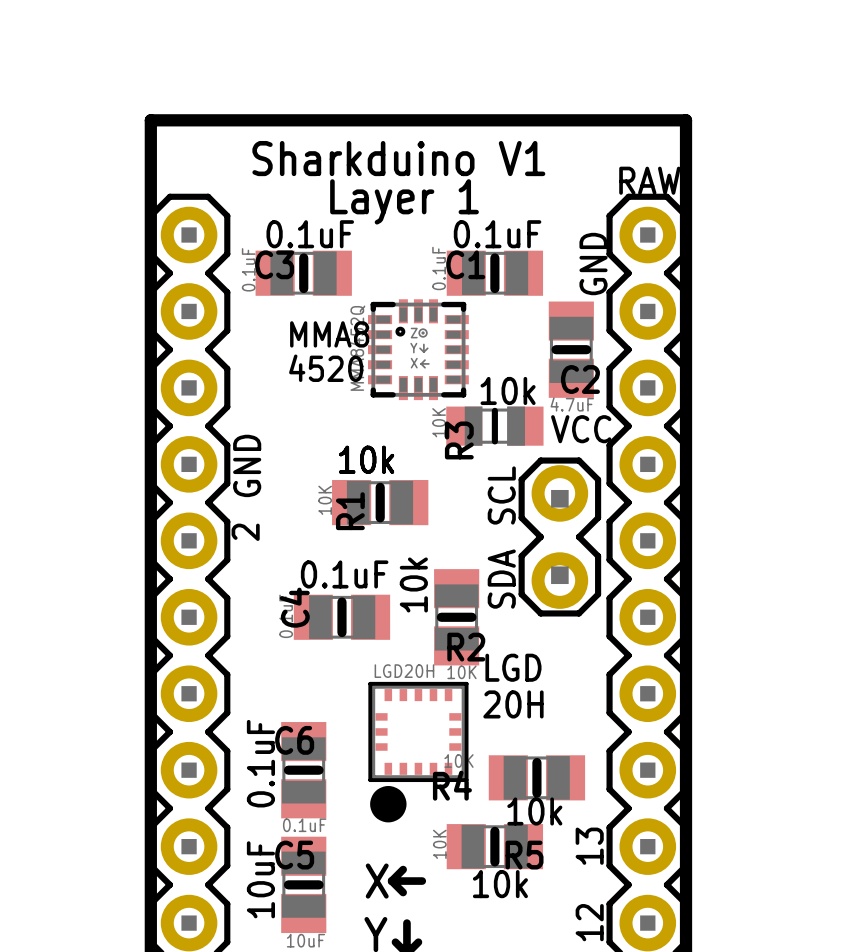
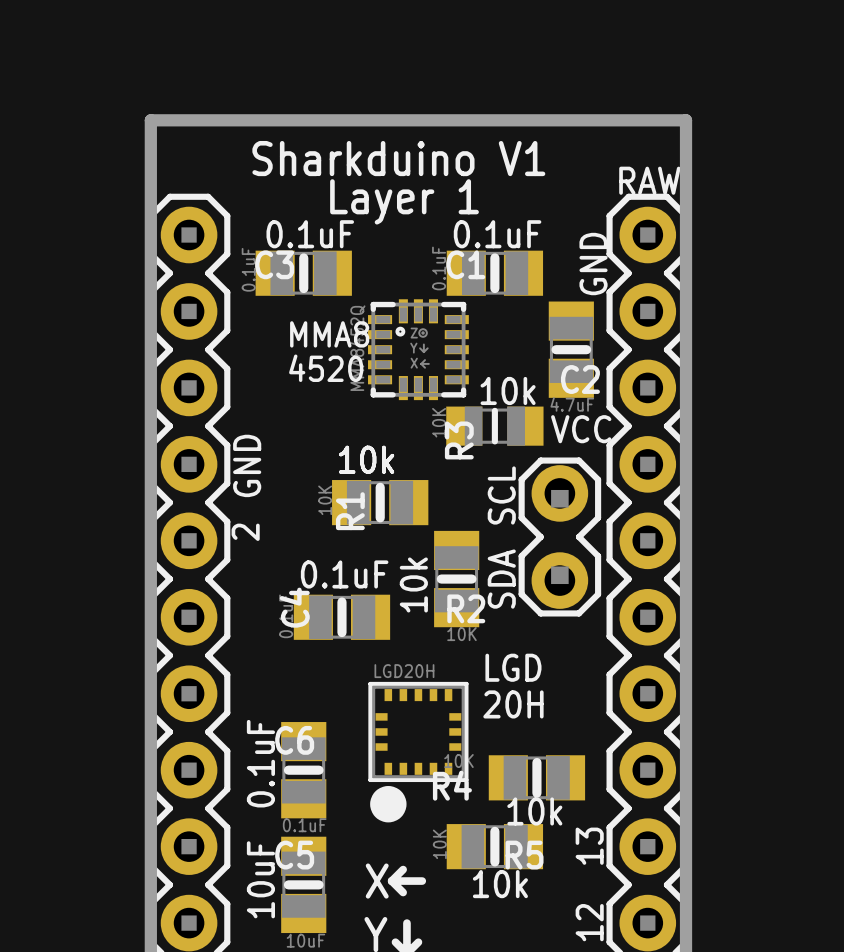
R2 position: (456, 617) -> (456, 579)

